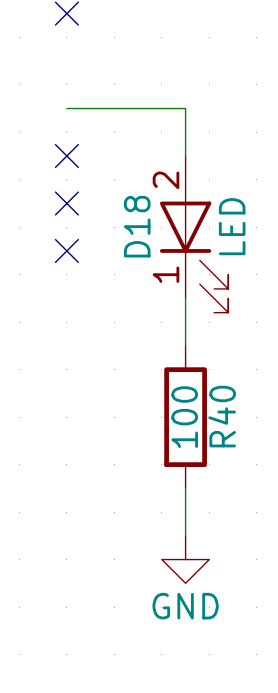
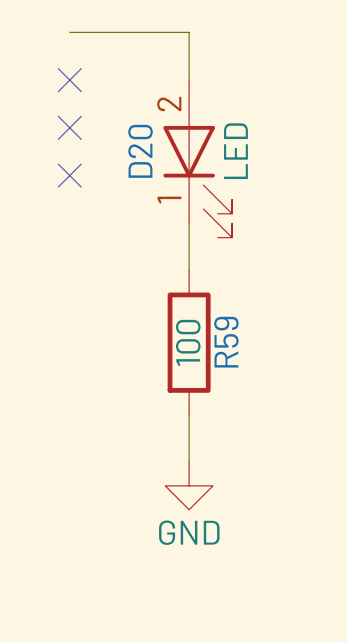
D18 name: D18 (137, 226) -> D20 (140, 151)
R40 name: R40 (222, 416) -> R59 (226, 342)

